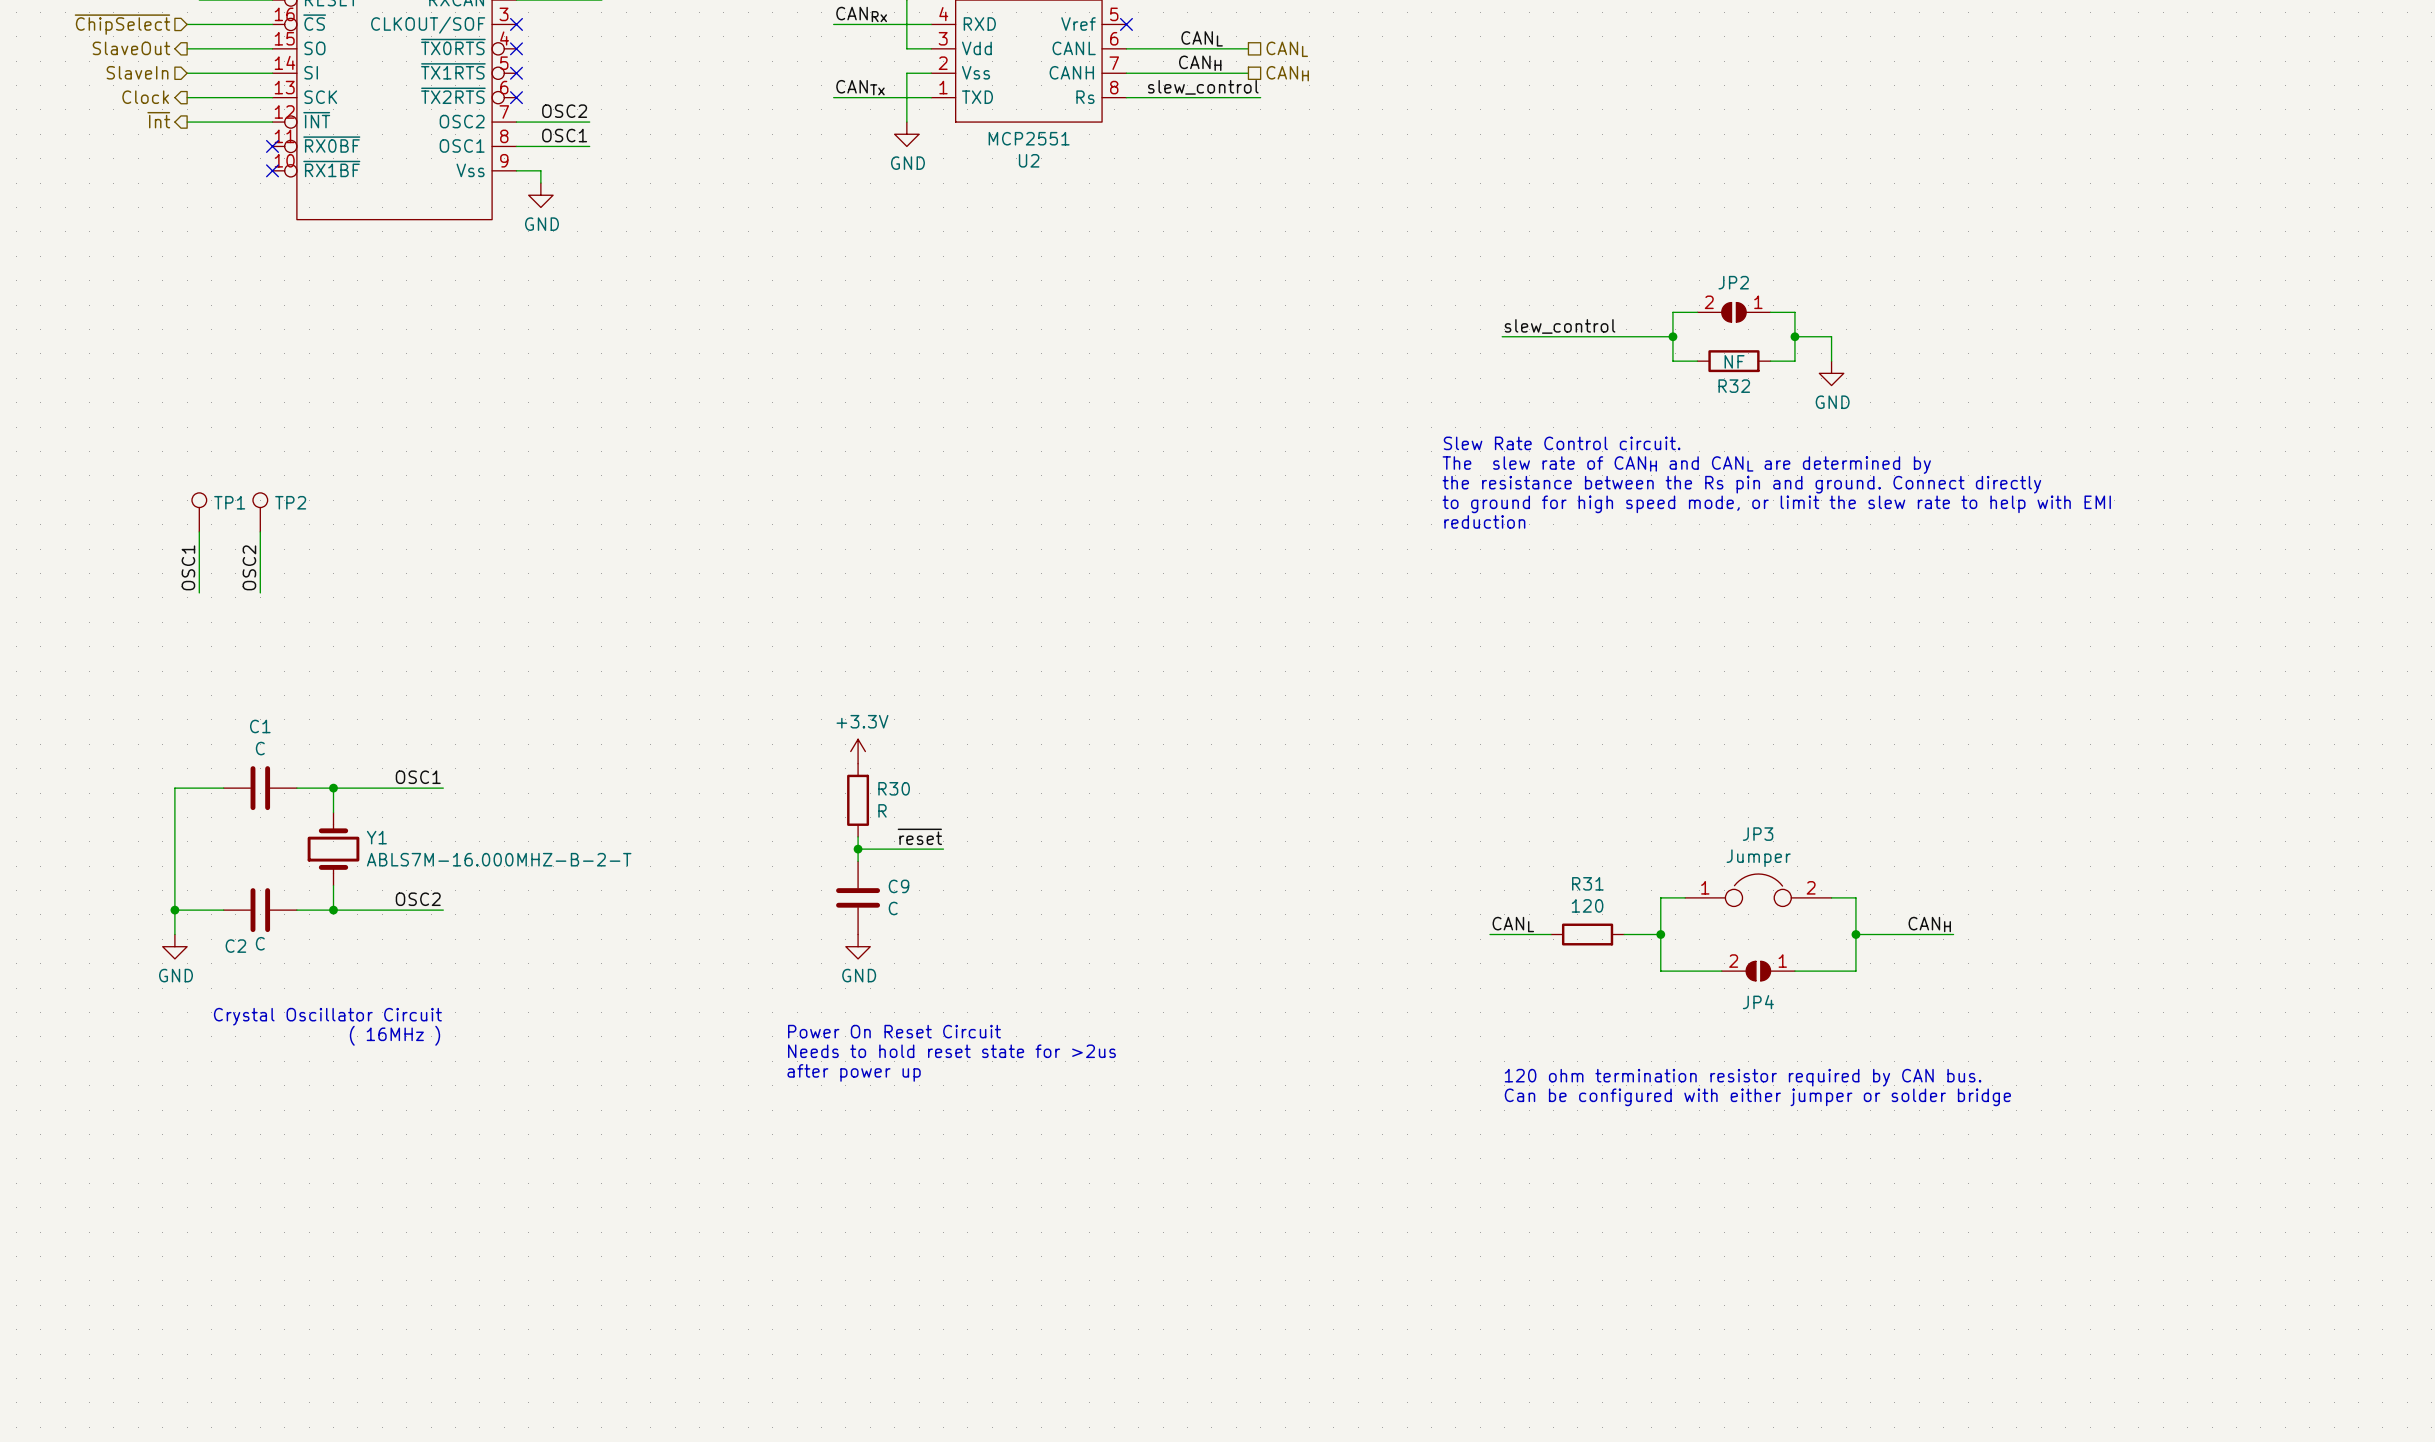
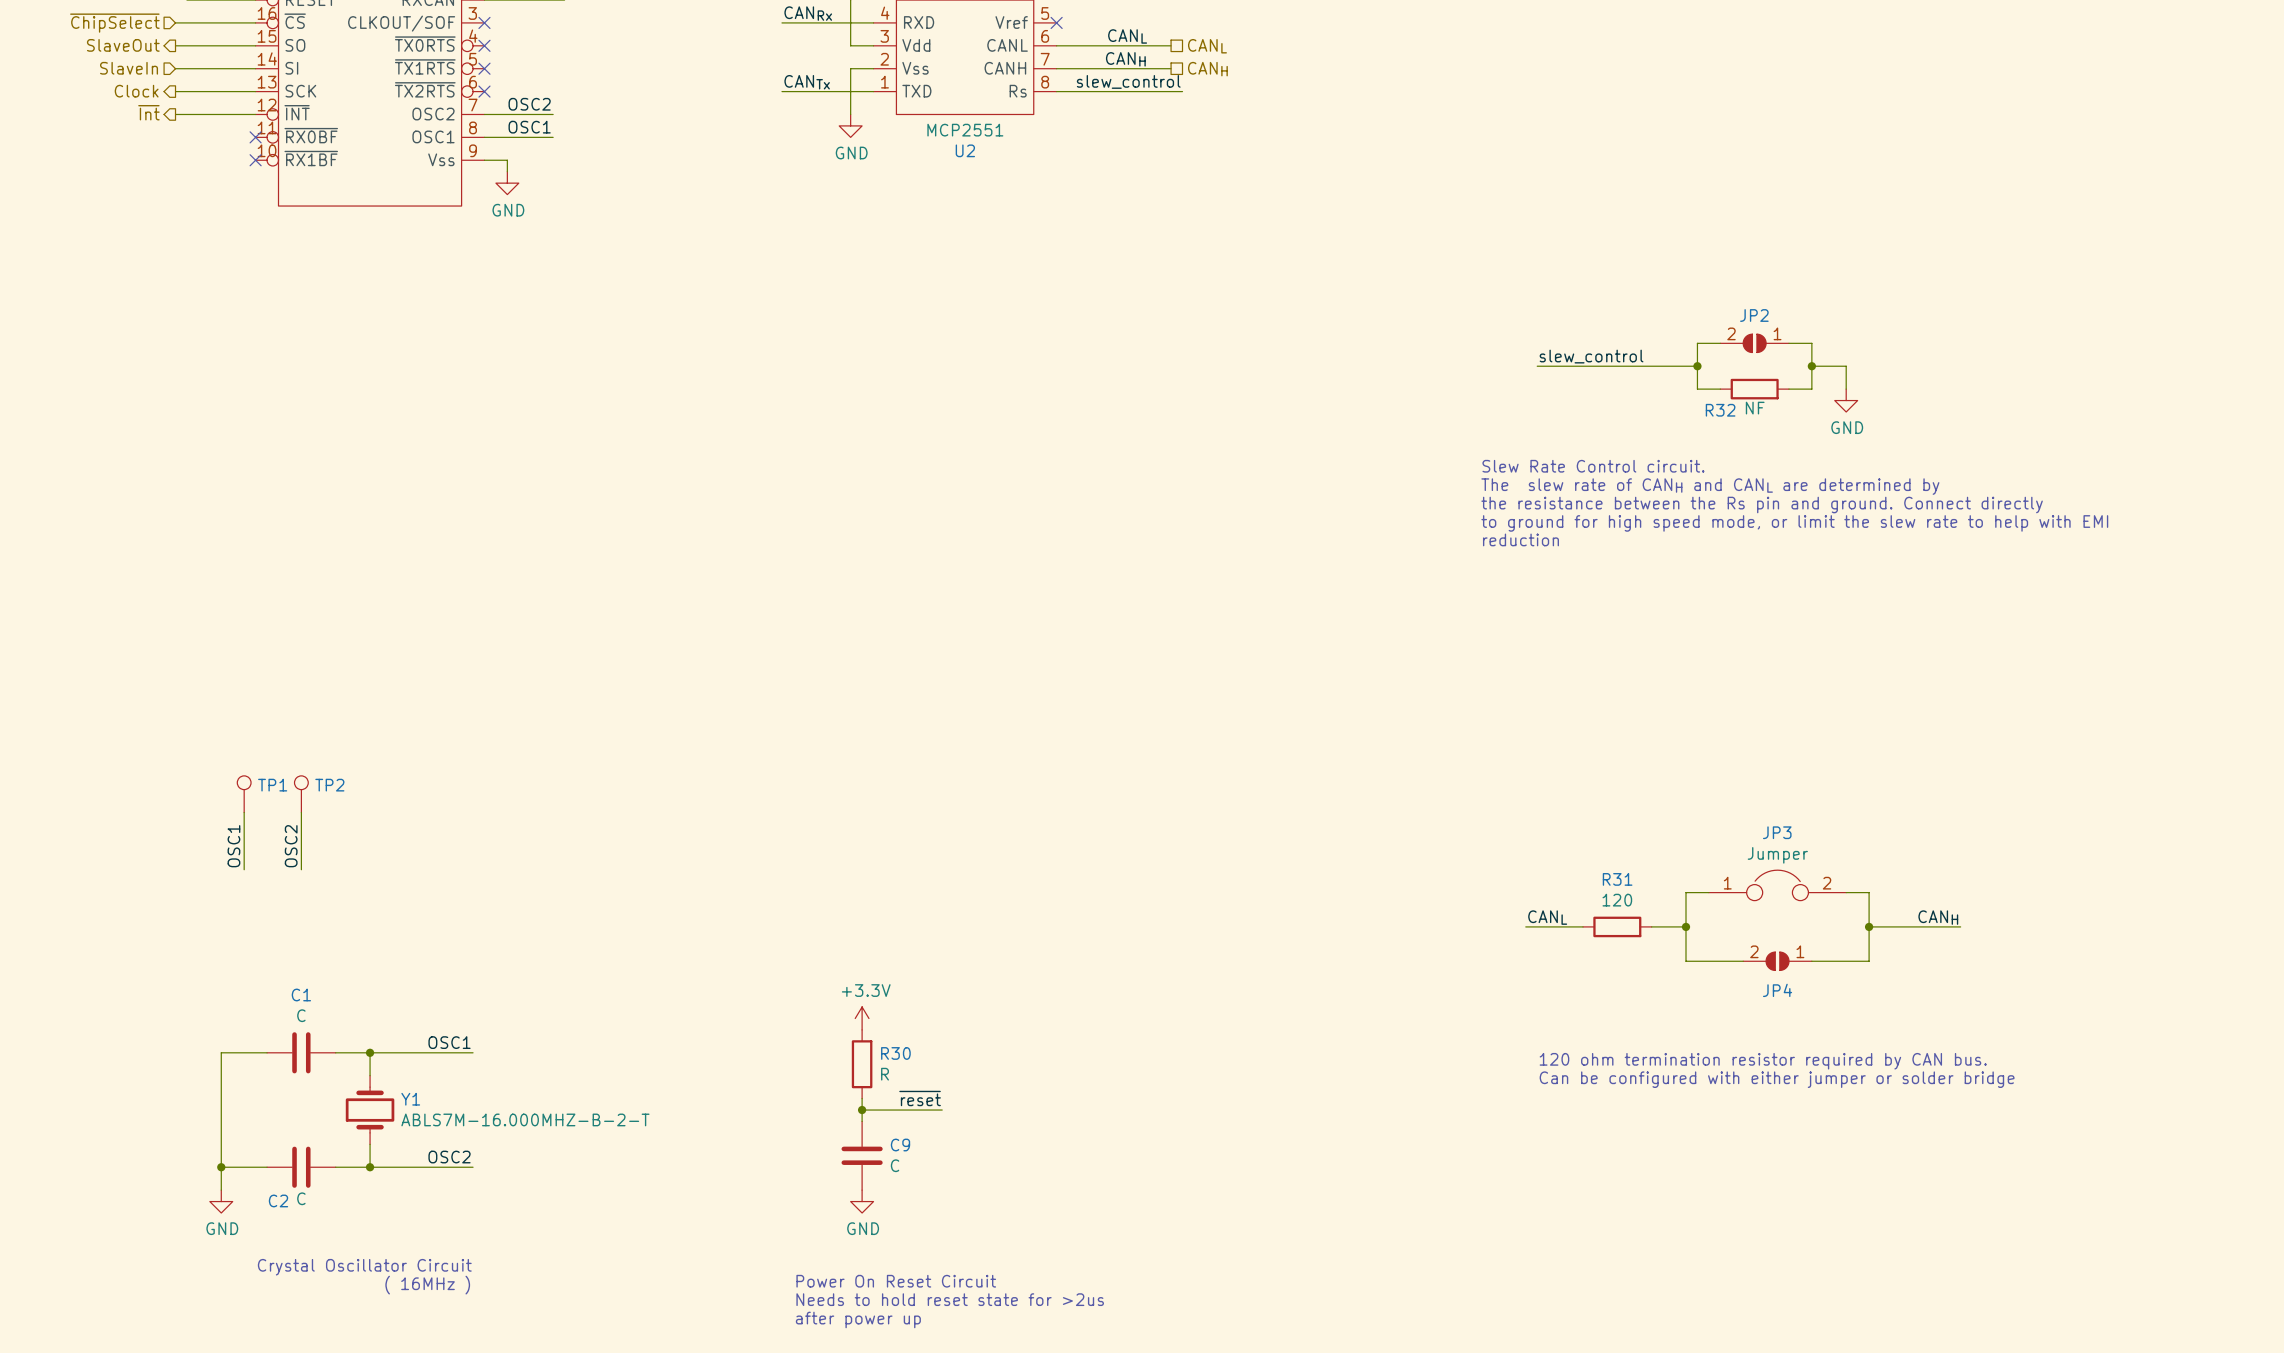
wire: (1697, 312) (1672, 312) (1672, 361) (1697, 361) -> (1720, 343) (1697, 343) (1697, 389) (1720, 389)
JP2 position: (1733, 312) -> (1754, 343)
wire: (1770, 312) (1794, 312) (1794, 361) (1770, 361) -> (1788, 343) (1811, 343) (1811, 389) (1788, 389)
label position: slew_control (1560, 326) -> slew_control (1591, 356)
wire: (1502, 336) (1672, 336) -> (1537, 366) (1697, 366)
junction: (1672, 336) -> none
wire: (1794, 336) (1831, 336) (1831, 361) -> (1811, 366) (1846, 366) (1846, 389)
junction position: (1794, 336) -> (1697, 366)
R32 position: (1733, 361) -> (1754, 389)
R32 value position: NF (1734, 361) -> NF (1755, 408)
power symbol position: GND (1831, 373) -> GND (1846, 400)
R32 name position: R32 (1734, 386) -> R32 (1720, 410)
junction: none -> (1811, 366)
text position: Slew Rate Control circuit. (1562, 443) -> Slew Rate Control circuit. (1593, 466)
text position: The slew rate of CANH and CANL are determined by (1686, 465) -> The slew rate of CANH and CANL are determined by (1710, 486)
text position: the resistance between the Rs pin and ground. Connect directly (1741, 484) -> the resistance between the Rs pin and ground. Connect directly (1762, 505)
text position: to ground for high speed mode, or limit the slew rate to help with EMI (1776, 504) -> to ground for high speed mode, or limit the slew rate to help with EMI (1794, 523)
TP1 position: (199, 512) -> (244, 794)
TP2 position: (260, 512) -> (301, 794)
text position: reduction (1484, 521) -> reduction (1520, 539)
wire: (199, 531) (199, 592) -> none
wire: (260, 531) (260, 592) -> none
label: OSC1 (188, 567) -> none
label: OSC2 (249, 567) -> none
power symbol: +3.3V (858, 751) -> none
label: OSC1 (418, 777) -> none
wire: (223, 788) (174, 788) (174, 934) -> none
C1 position: (260, 788) -> (301, 1052)
wire: (296, 788) (443, 788) -> none
wire: (333, 788) (333, 812) -> none
junction: (333, 788) -> none
R30 position: (858, 800) -> (862, 1064)
wire: (858, 836) (858, 861) -> none
label: ~{reset} (919, 836) -> none
Y1 position: (333, 849) -> (370, 1110)
wire: (858, 849) (943, 849) -> none
junction: (858, 849) -> none
wire: none -> (244, 812) (244, 869)
wire: none -> (301, 812) (301, 869)
wire: (333, 885) (333, 910) -> none
JP3 position: (1758, 890) -> (1777, 885)
C9 position: (858, 897) -> (862, 1155)
wire: (1685, 897) (1660, 897) (1660, 971) (1721, 971) -> (1708, 892) (1685, 892) (1685, 961) (1743, 961)
wire: (1831, 897) (1855, 897) (1855, 971) (1794, 971) -> (1846, 892) (1869, 892) (1869, 961) (1811, 961)
label rotation: 0° (418, 899) -> 90° counterclockwise (291, 846)
label position: OSC2 (418, 899) -> OSC2 (291, 846)
label: none -> OSC1 (233, 846)
wire: (174, 910) (223, 910) -> none
junction: (174, 910) -> none
C2 position: (260, 910) -> (301, 1167)
wire: (296, 910) (443, 910) -> (335, 1052) (473, 1052)
junction: (333, 910) -> none
label position: CANL (1513, 924) -> CANL (1547, 917)
label position: CANH (1929, 924) -> CANH (1938, 917)
wire: (1489, 934) (1550, 934) -> (1525, 926) (1583, 926)
R31 position: (1587, 934) -> (1617, 926)
wire: (1624, 934) (1660, 934) -> (1651, 926) (1685, 926)
junction: (1660, 934) -> none
wire: (1855, 934) (1953, 934) -> (1869, 926) (1960, 926)
junction: (1855, 934) -> none
power symbol: GND (174, 946) -> none
power symbol: GND (858, 946) -> none
JP4 position: (1758, 971) -> (1777, 961)
junction: none -> (1685, 926)
junction: none -> (1869, 926)
text: Crystal Oscillator Circuit (327, 1016) -> none
text: Power On Reset Circuit (894, 1031) -> none
text: ( 16MHz ) (394, 1035) -> none
text: Needs to hold reset state for >2us (951, 1051) -> none
text: after power up (854, 1072) -> none
text position: 120 ohm termination resistor required by CAN bus. (1743, 1077) -> 120 ohm termination resistor required by CAN bus. (1763, 1061)
power symbol: none -> +3.3V (862, 1018)
text position: Can be configured with either jumper or solder bridge (1757, 1097) -> Can be configured with either jumper or solder bridge (1777, 1079)
label: none -> OSC1 (449, 1042)
wire: none -> (267, 1052) (221, 1052) (221, 1190)
wire: none -> (370, 1052) (370, 1075)
junction: none -> (370, 1052)
wire: none -> (862, 1098) (862, 1121)
label: none -> ~{reset} (920, 1098)
wire: none -> (862, 1110) (942, 1110)
junction: none -> (862, 1110)
wire: none -> (370, 1144) (370, 1167)
label: none -> OSC2 (449, 1157)
wire: none -> (221, 1167) (267, 1167)
junction: none -> (221, 1167)
wire: none -> (335, 1167) (473, 1167)
junction: none -> (370, 1167)
power symbol: none -> GND (221, 1201)
power symbol: none -> GND (862, 1201)
text: none -> Crystal Oscillator Circuit (364, 1267)
text: none -> Power On Reset Circuit (896, 1281)
text: none -> ( 16MHz ) (427, 1285)
text: none -> Needs to hold reset state for >2us (950, 1299)
text: none -> after power up (858, 1319)

